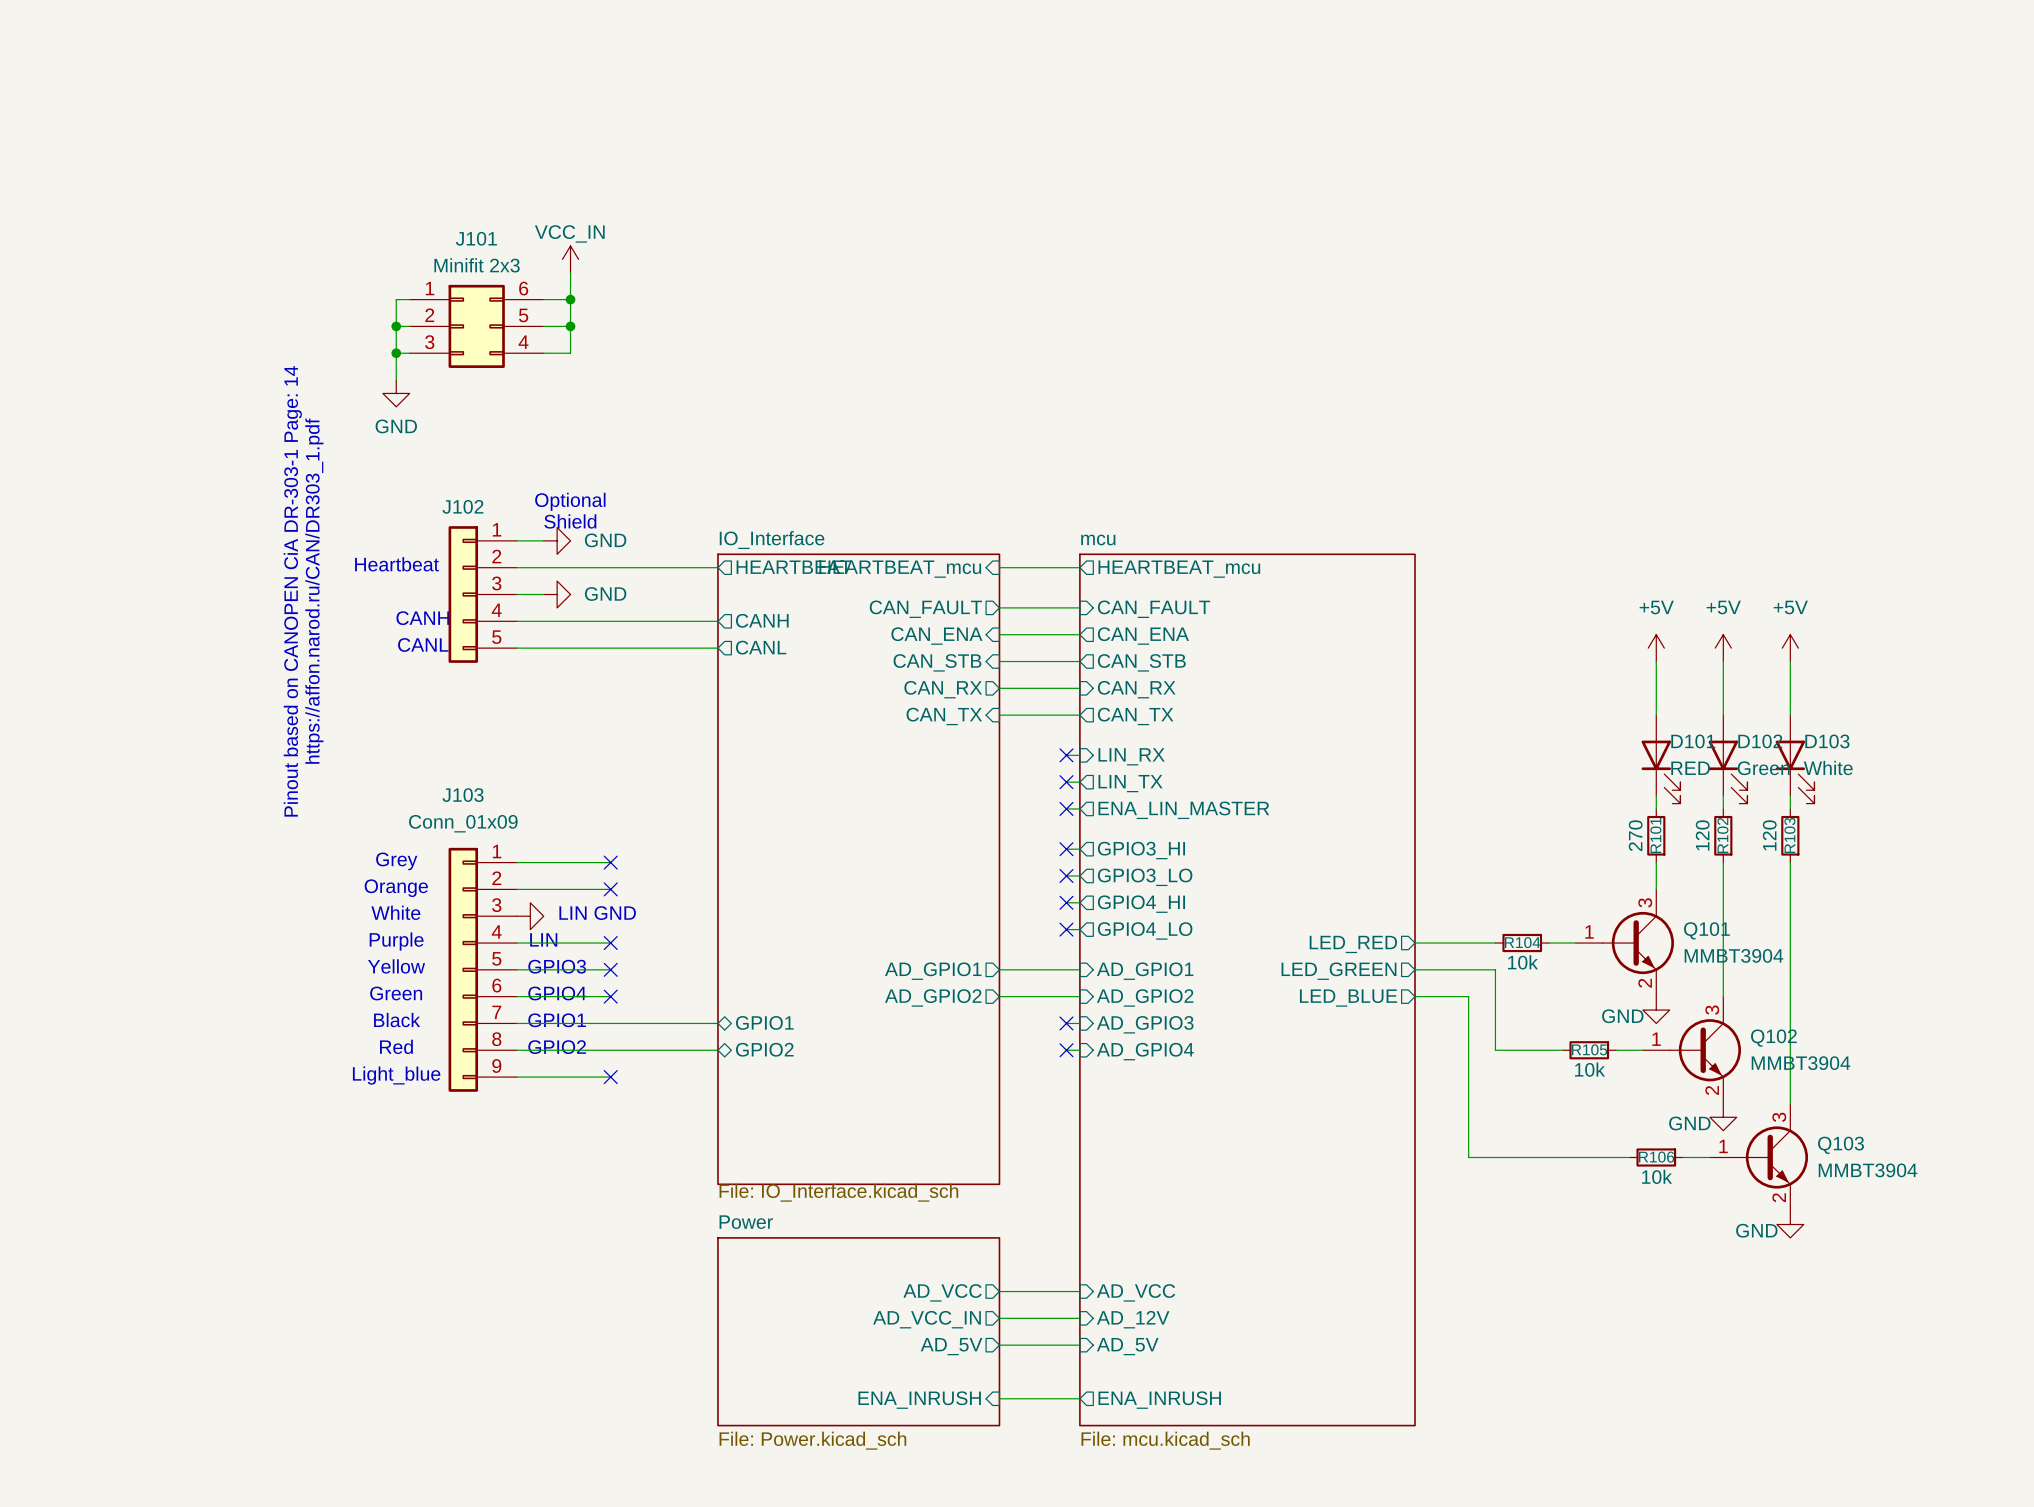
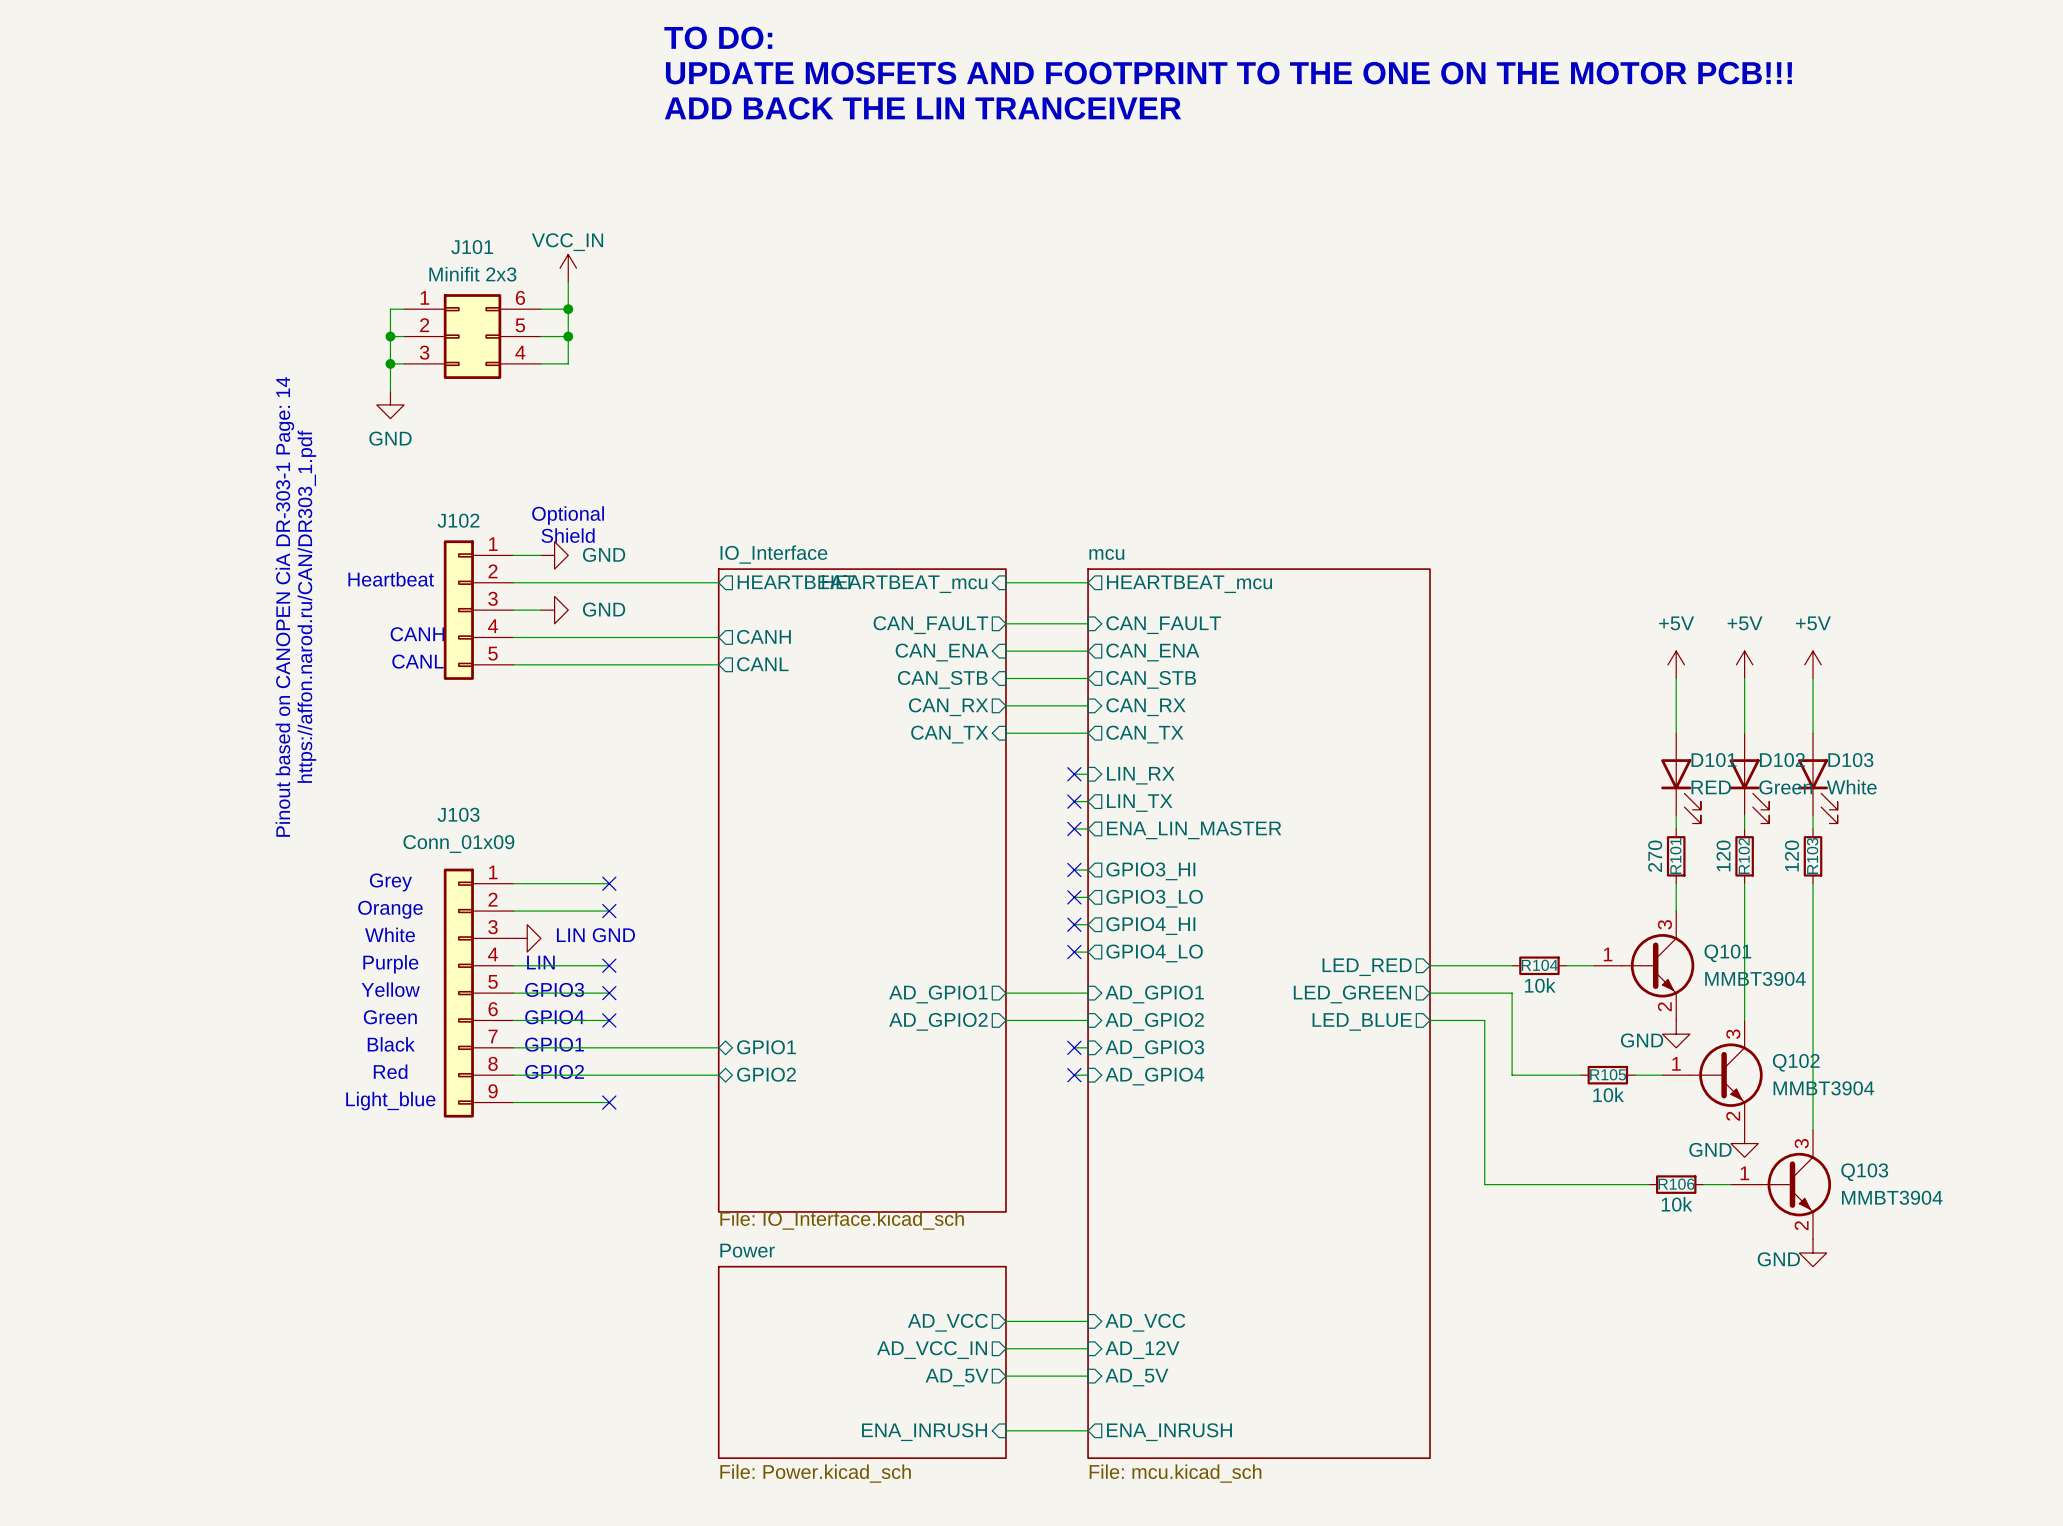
text: none -> TO DO: (718, 37)
text: none -> UPDATE MOSFETS AND FOOTPRINT TO THE ONE ON THE MOTOR PCB!!! (1228, 73)
text: none -> ADD BACK THE LIN TRANCEIVER (923, 108)

